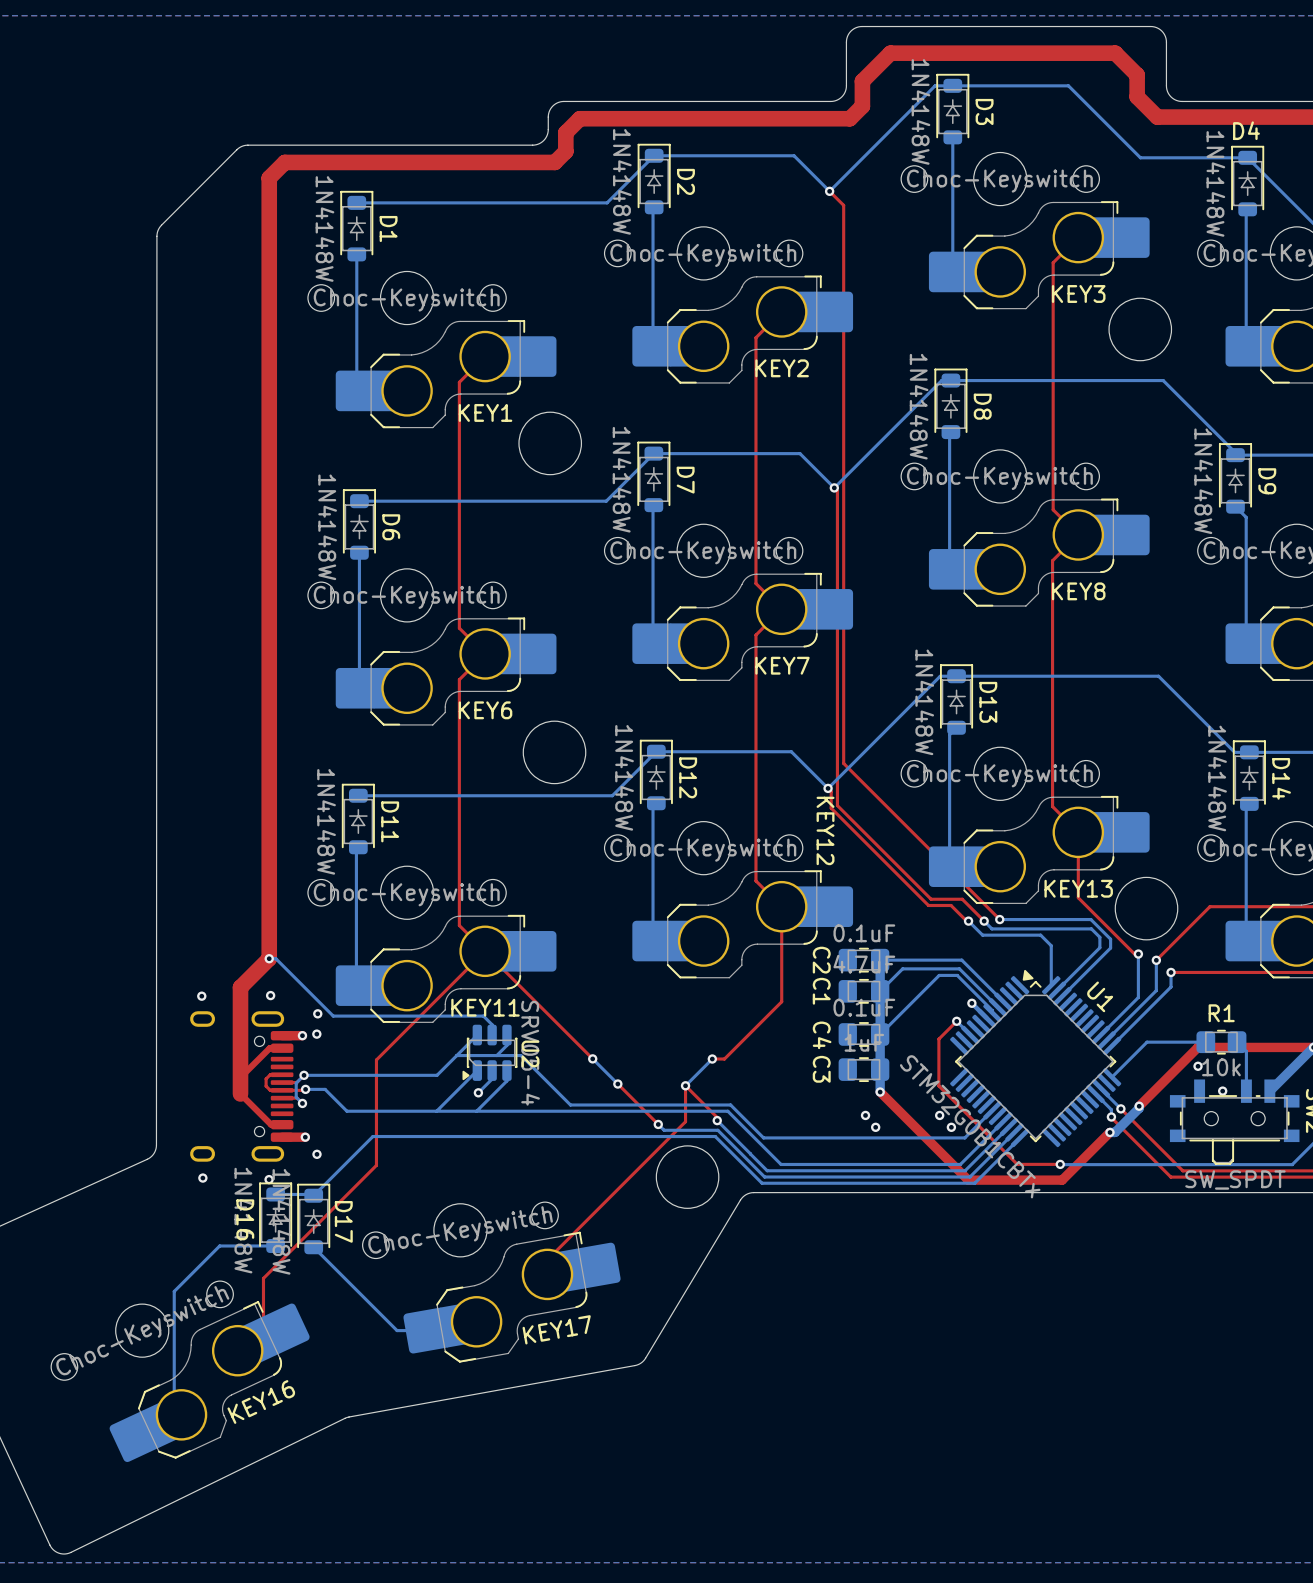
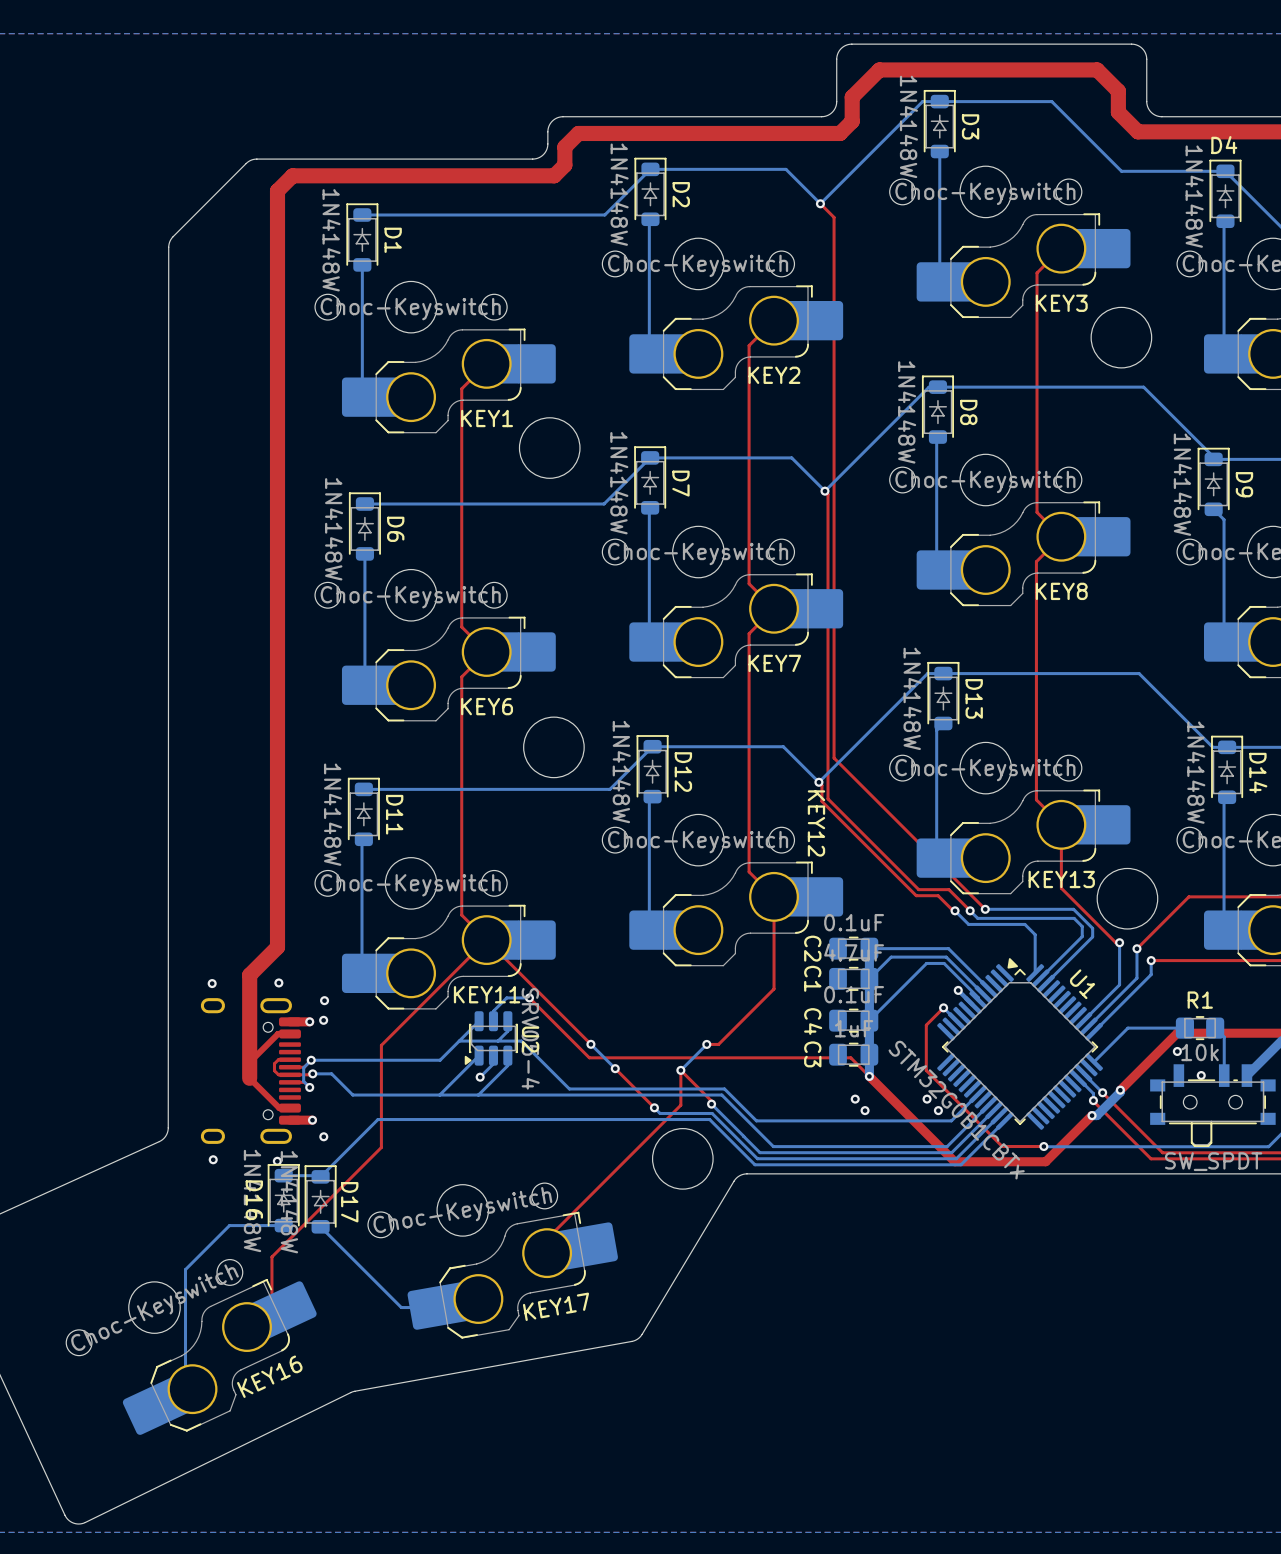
bottom track: (269, 958) (275, 958) (333, 1016) (483, 1016) (492, 1024) -> (529, 997) (506, 997) (493, 1011)
via: (269, 958) -> none
top track: none -> (529, 997) (589, 1057) (850, 1057) (869, 1076)
via: none -> (529, 997)

